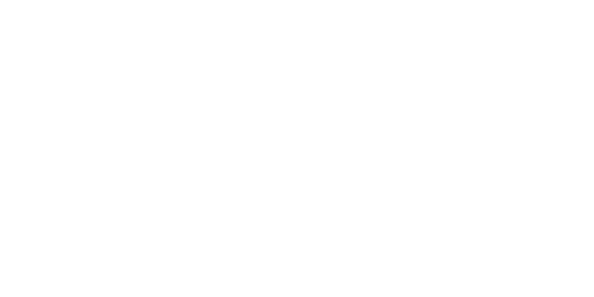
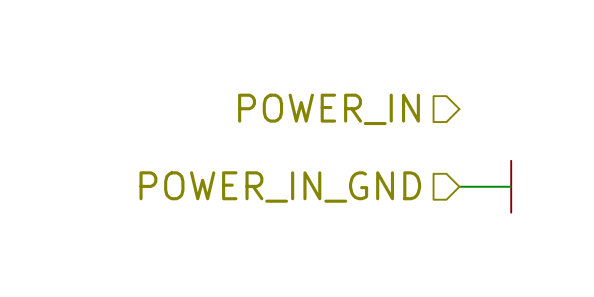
hierarchical label: none -> POWER_IN (329, 109)
wire: none -> (459, 186) (511, 186)
power symbol: none -> (511, 186)
hierarchical label: none -> POWER_IN_GND (280, 187)

